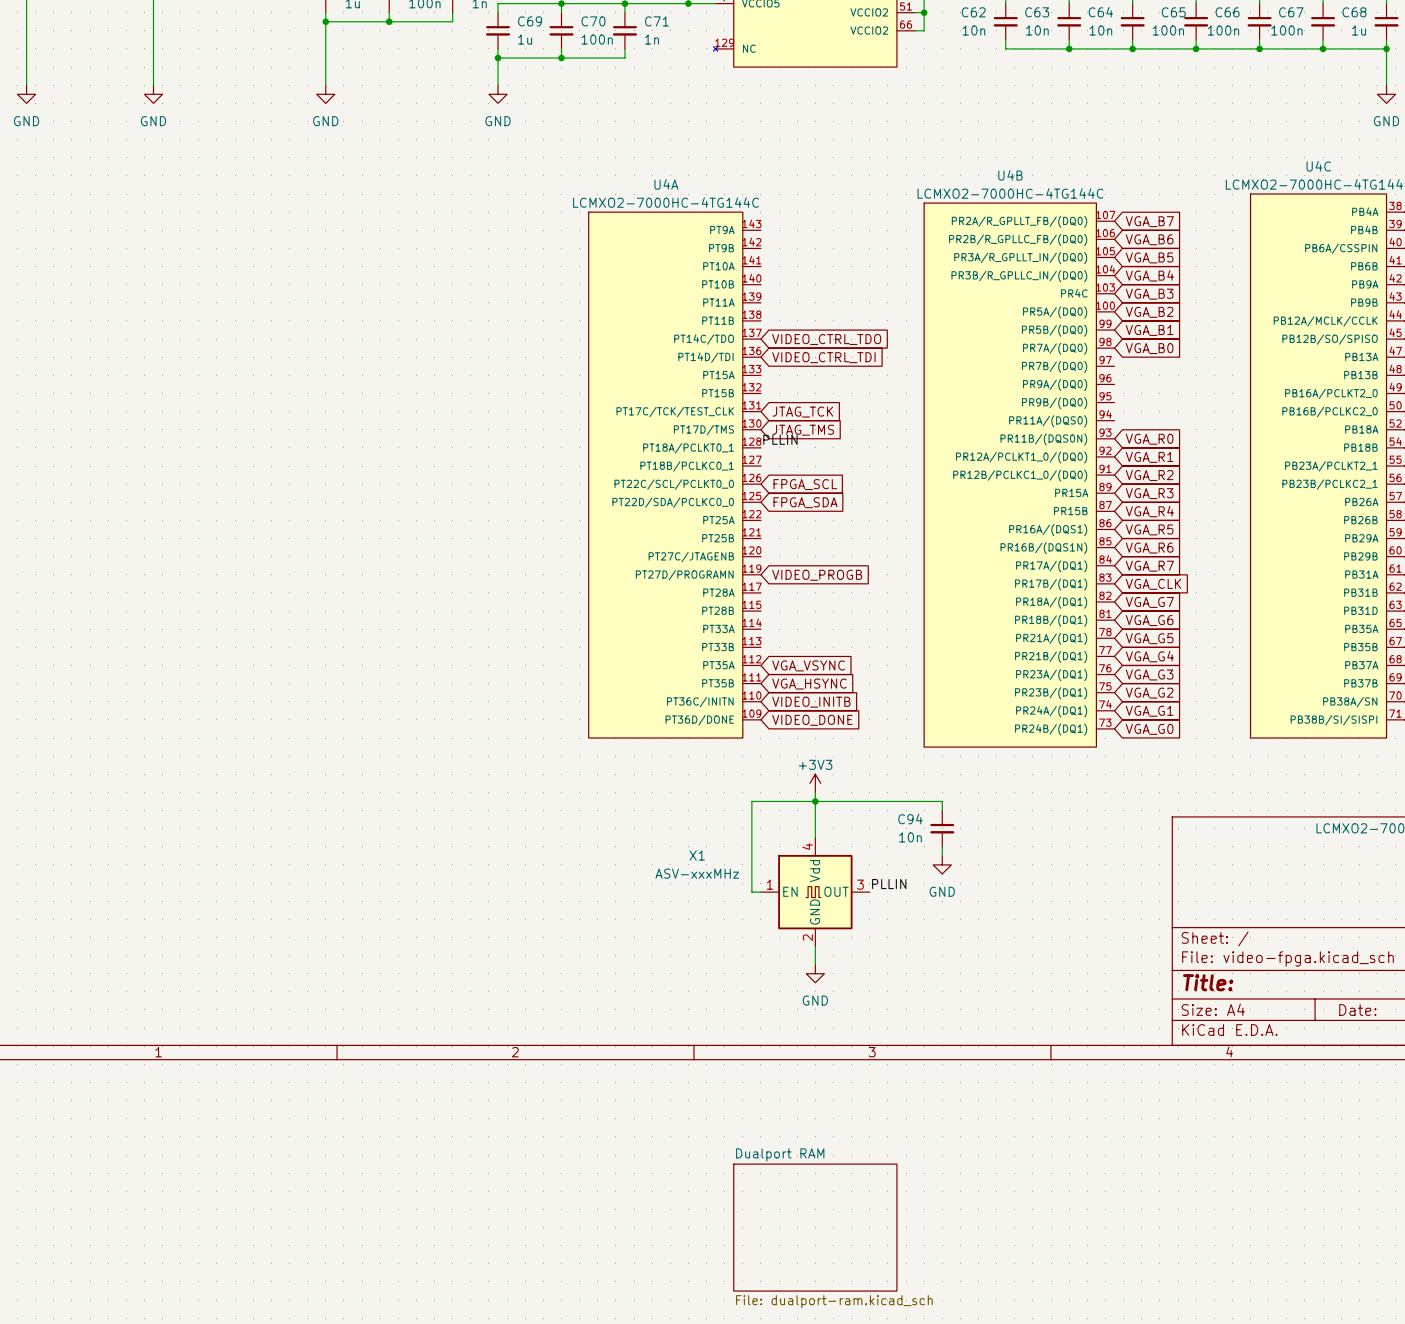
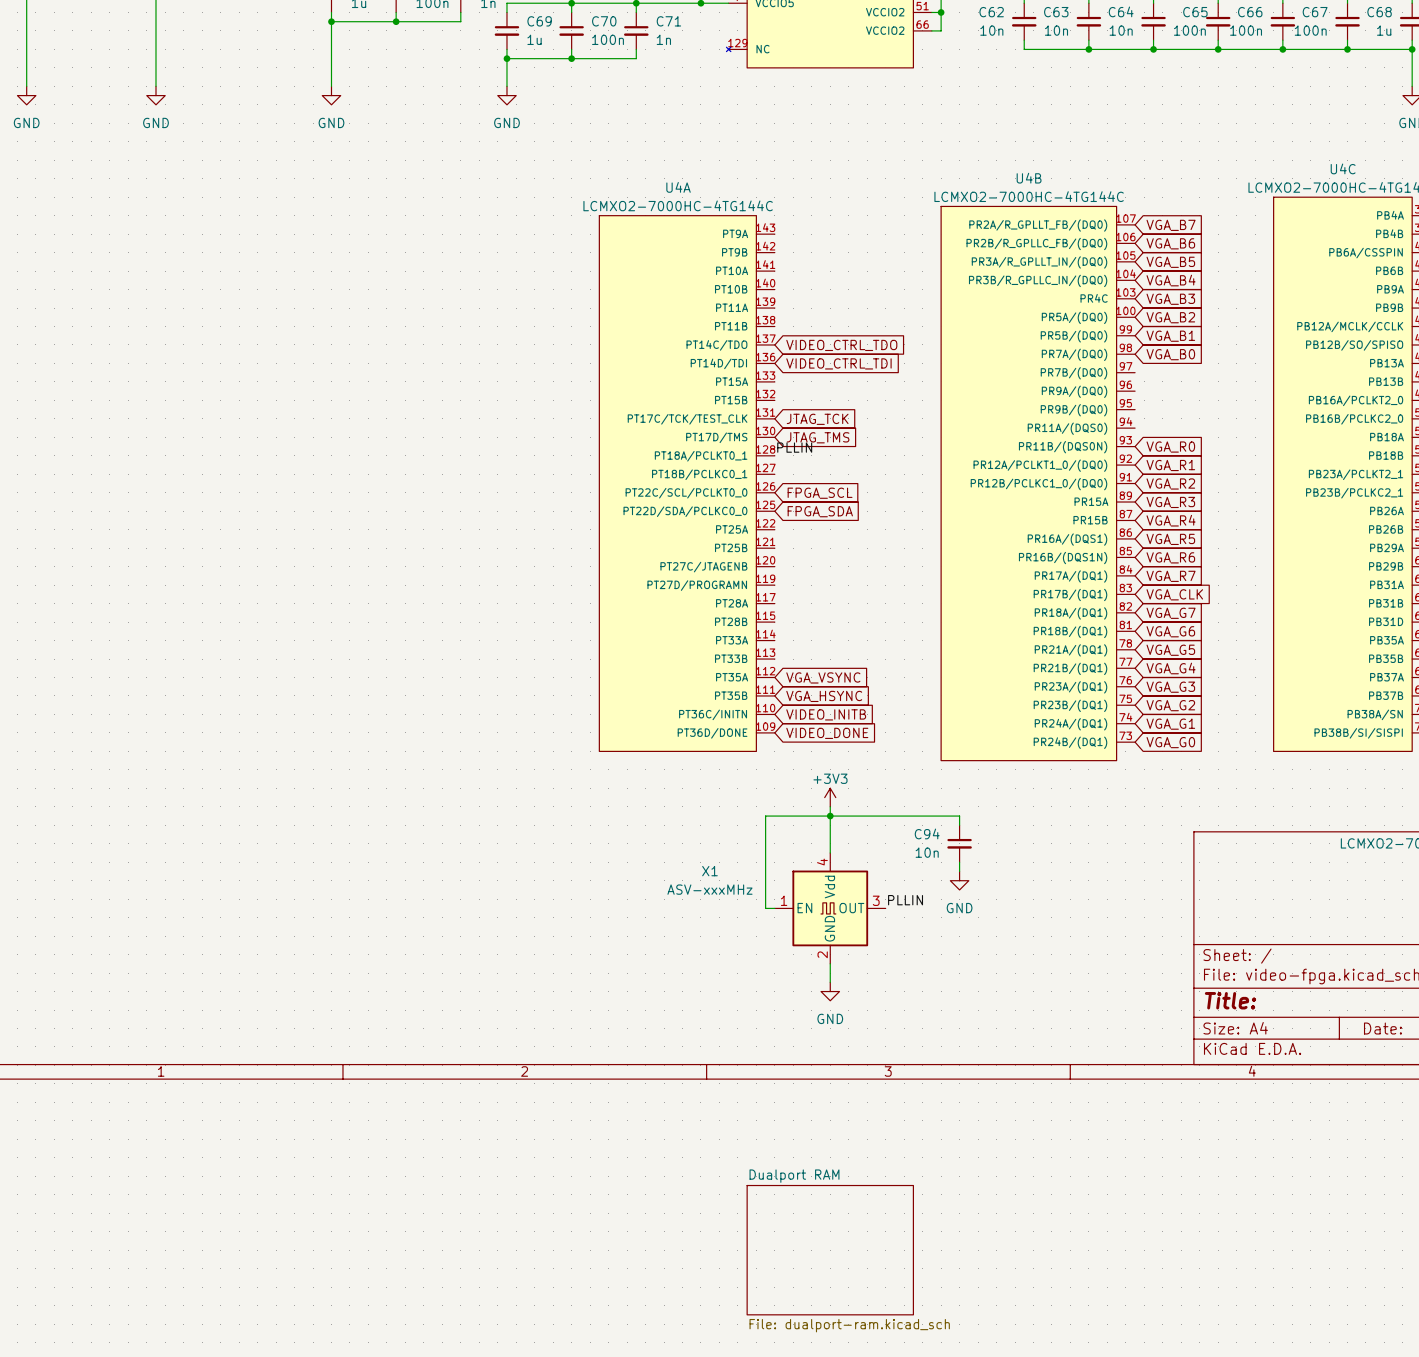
global label: VIDEO_PROGB (817, 575) -> none

